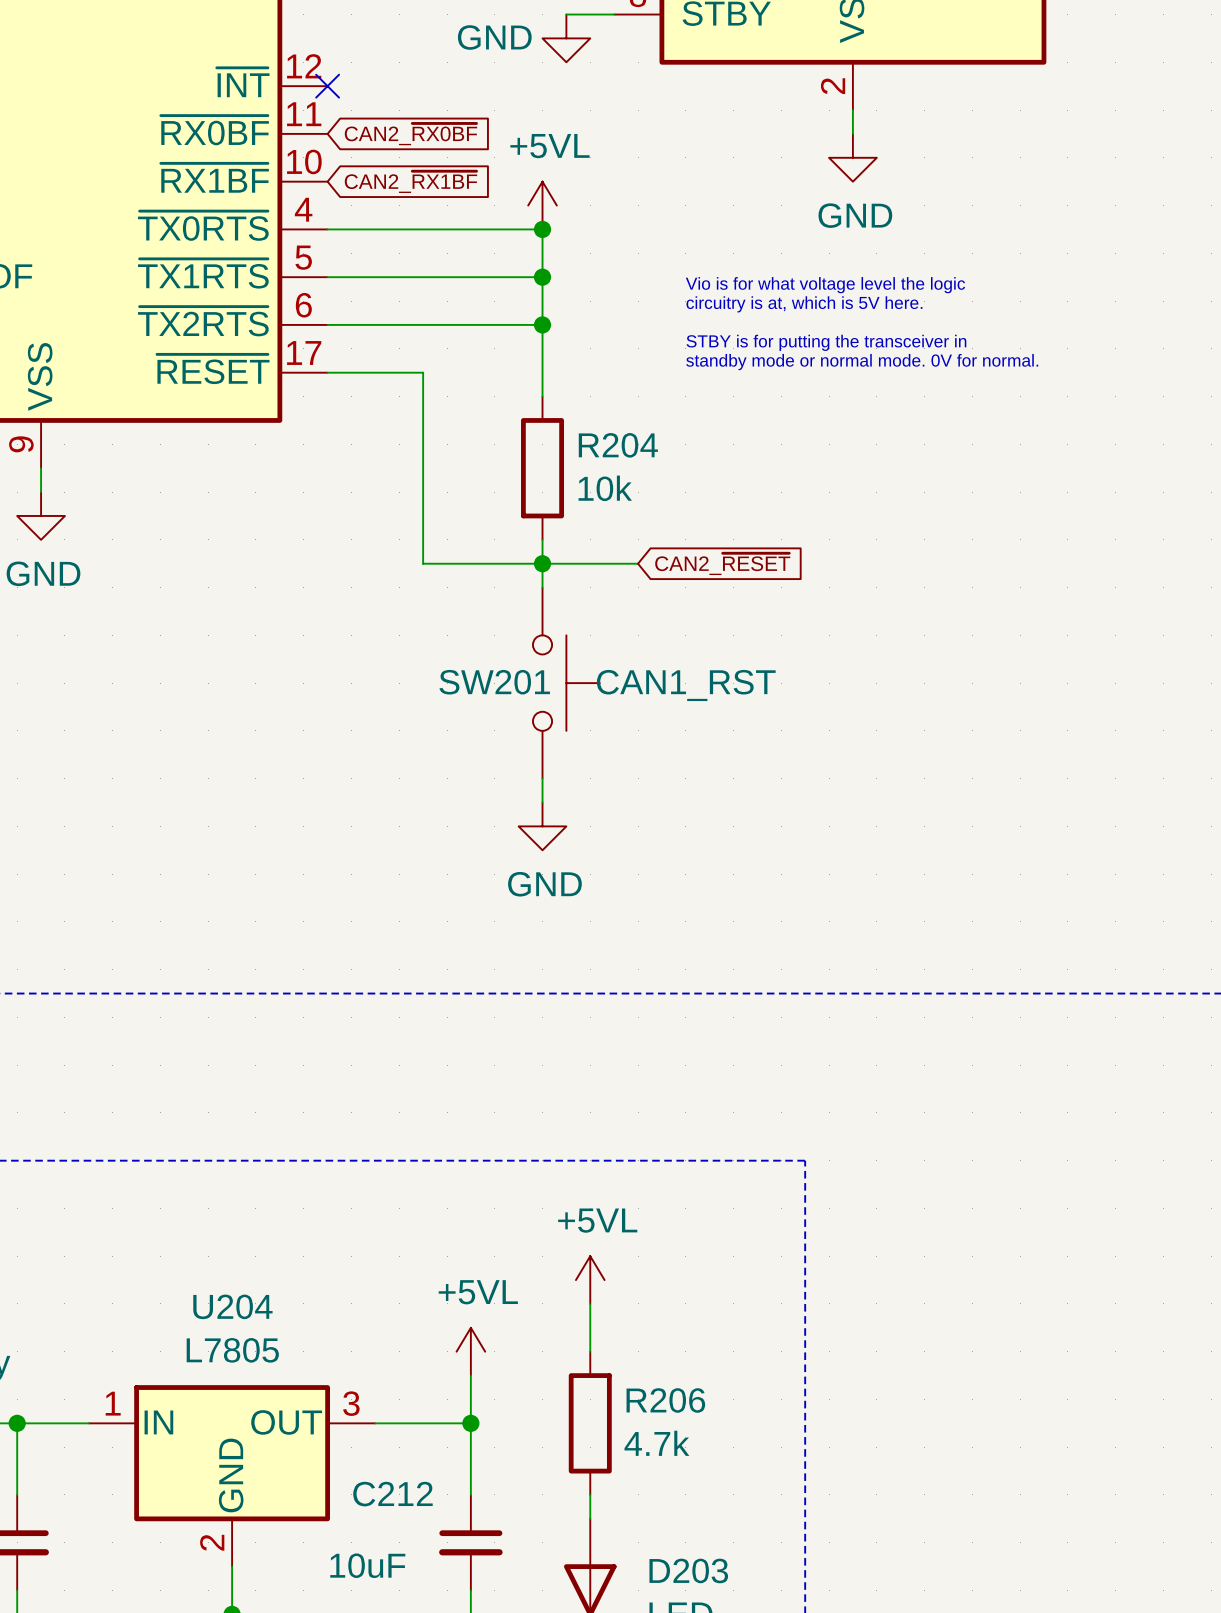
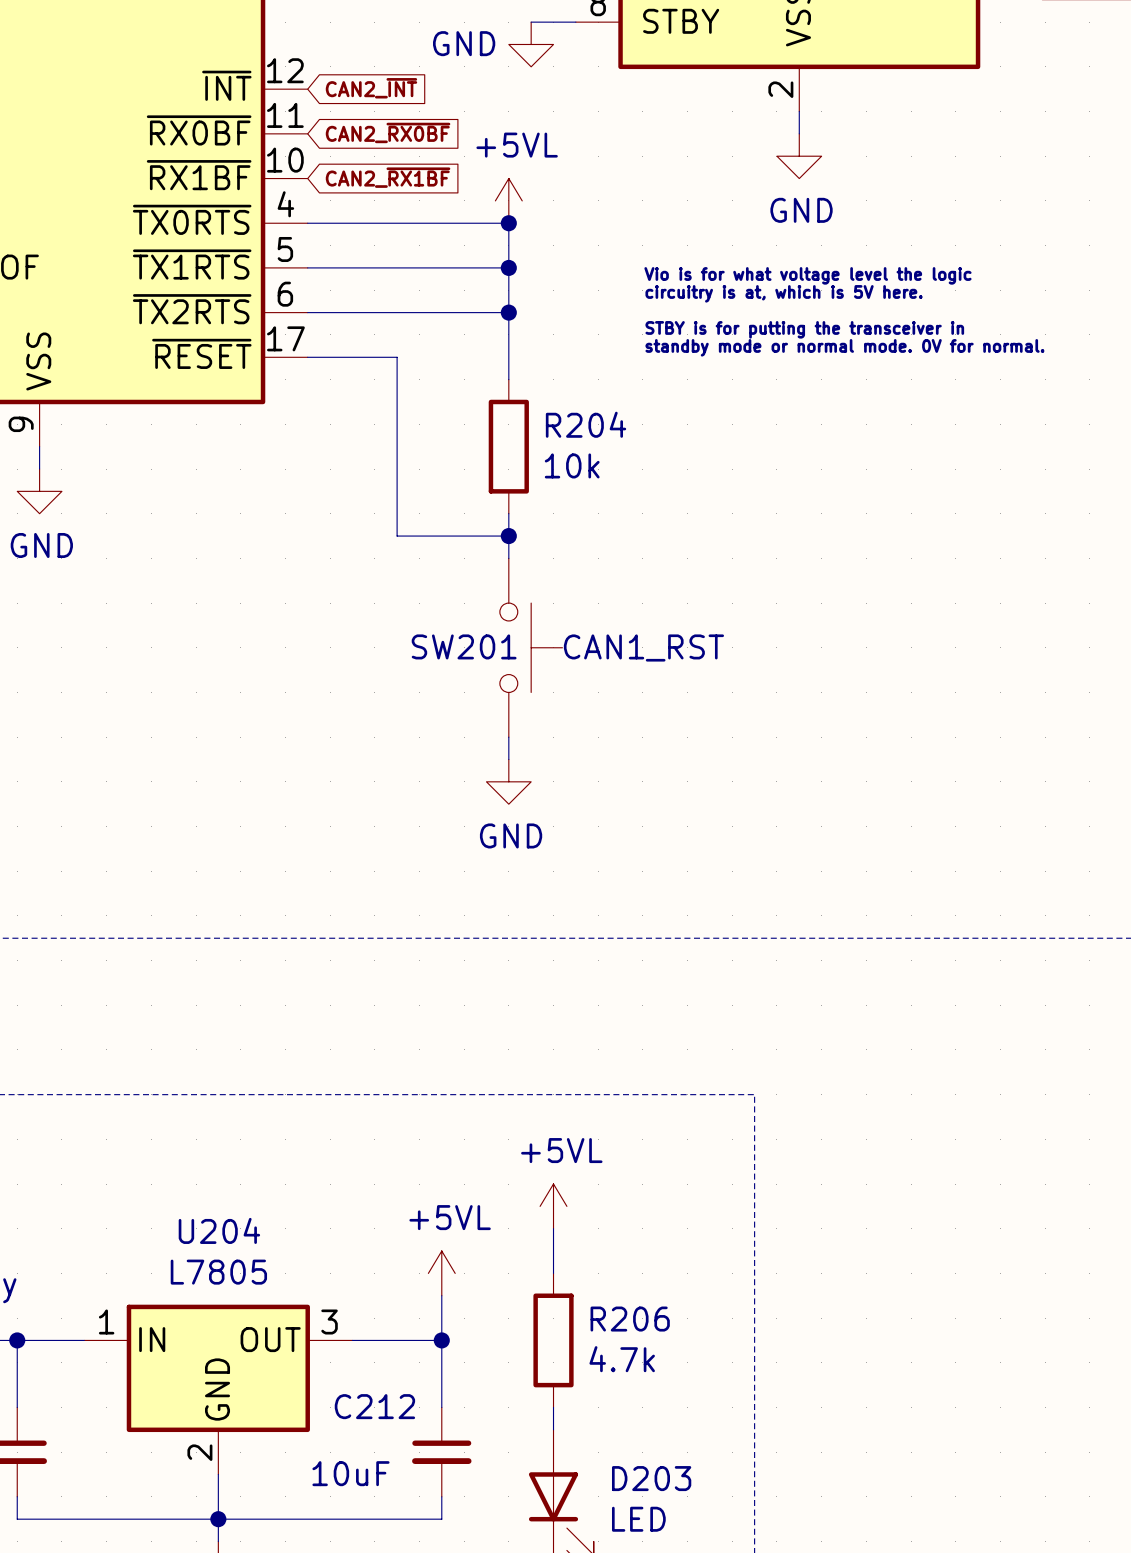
no-connect mark: (327, 86) -> none
global label: none -> CAN2_~{INT} (371, 88)
wire: (542, 563) (638, 563) -> none
global label: CAN2_~{RESET} (722, 564) -> none

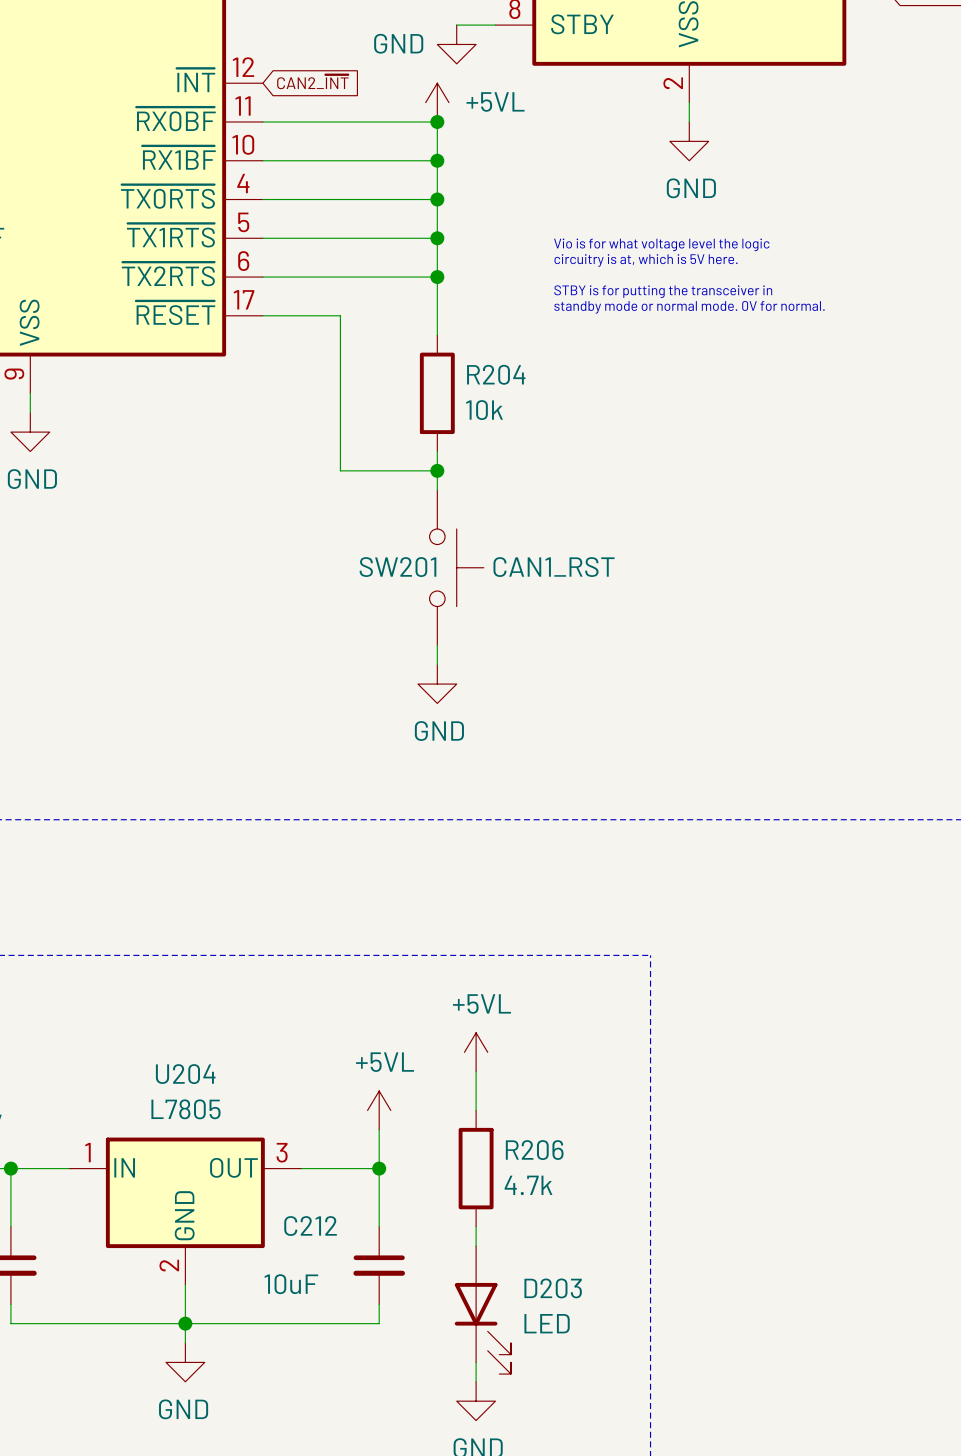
global label: CAN2_~{RX0BF} (388, 132) -> none
wire: none -> (262, 121) (437, 121) (437, 199)
junction: none -> (437, 121)
power symbol text position: +5VL (517, 145) -> +5VL (495, 101)
global label: CAN2_~{RX1BF} (388, 177) -> none
wire: none -> (262, 160) (437, 160)
junction: none -> (437, 160)
power symbol position: +5VL (508, 200) -> +5VL (437, 102)

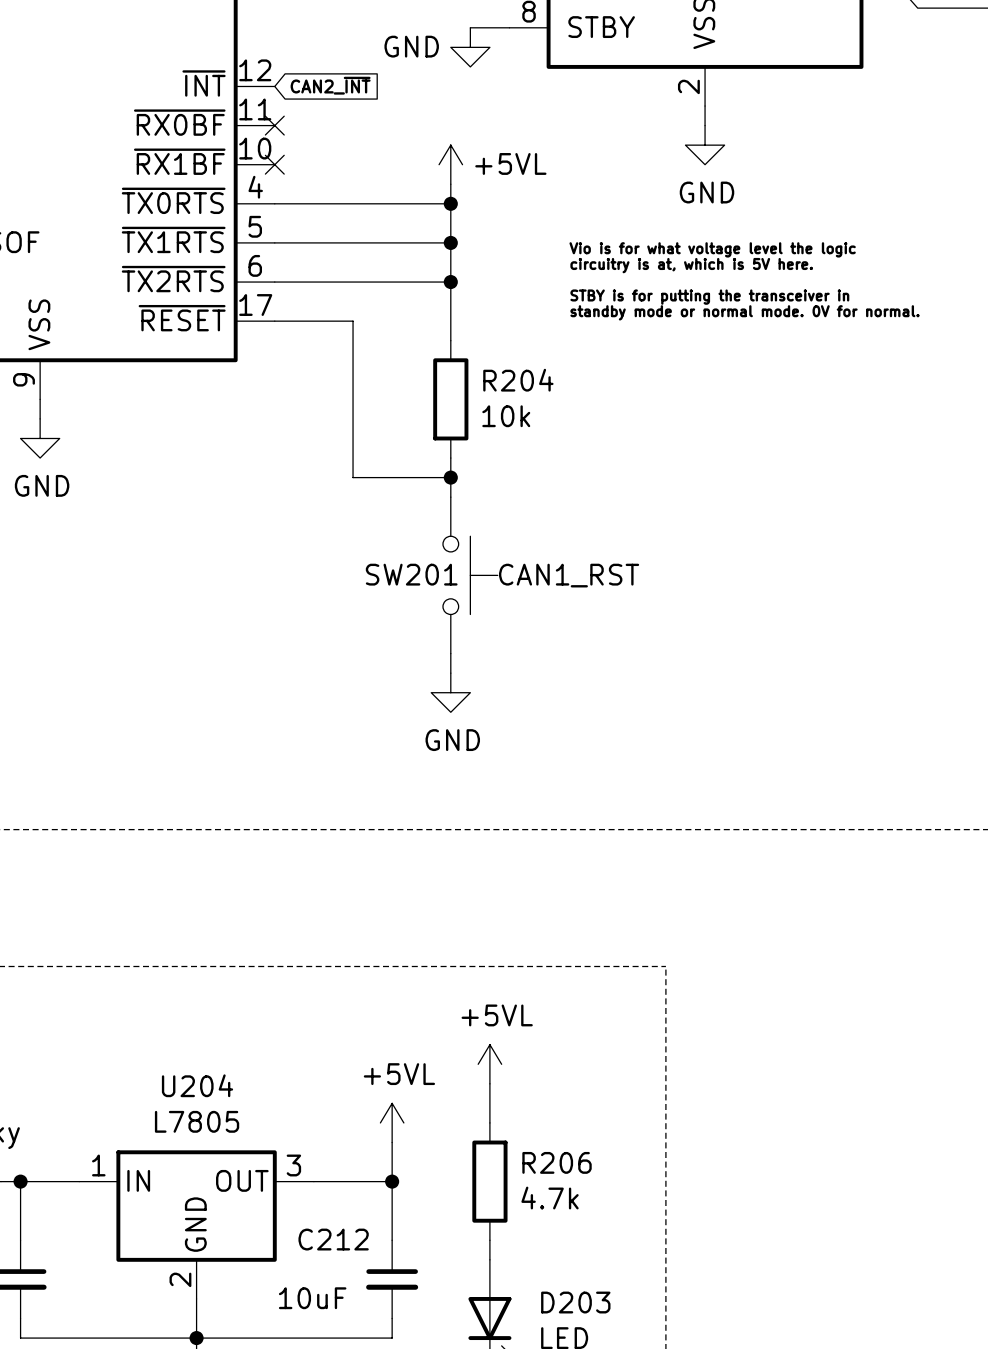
power symbol position: +5VL (437, 102) -> +5VL (450, 164)
wire: (262, 121) (437, 121) (437, 180) -> none
no-connect mark: none -> (274, 125)
junction: (437, 121) -> none
wire: (262, 160) (437, 160) -> none
no-connect mark: none -> (274, 164)
junction: (437, 160) -> none

